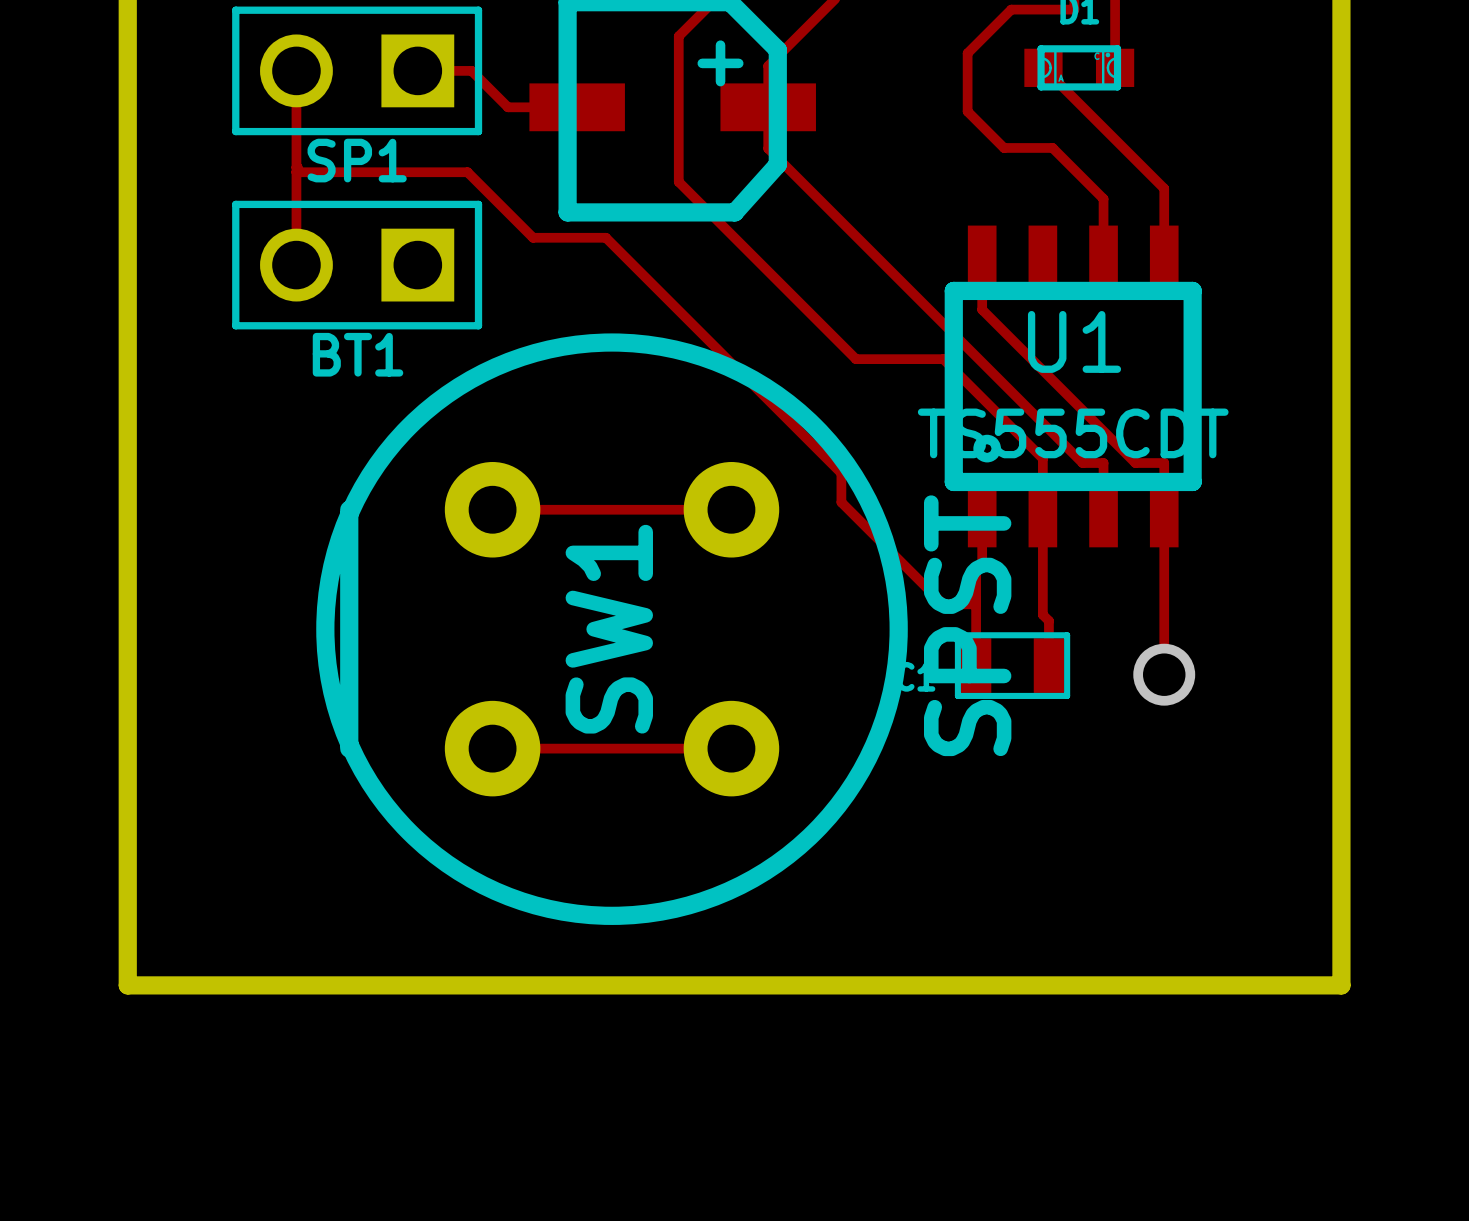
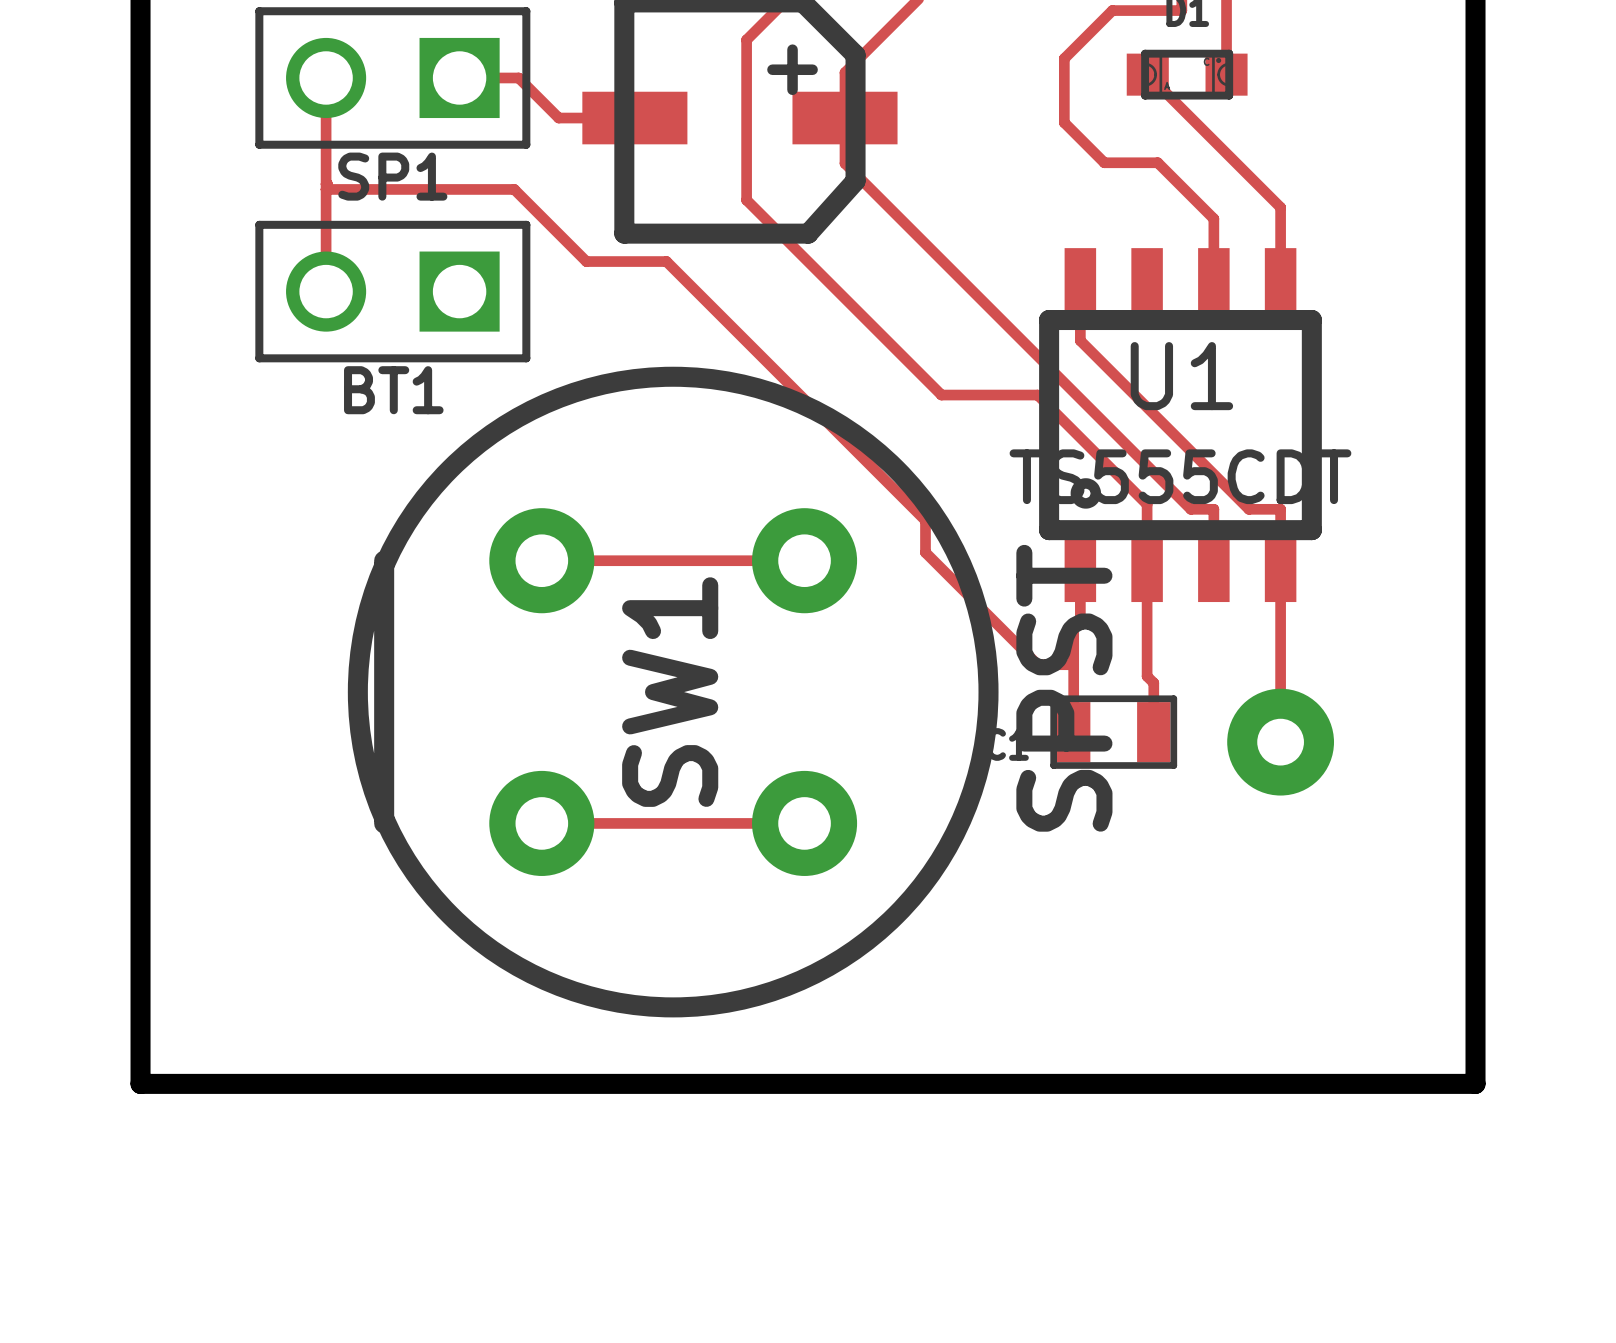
via size: [1133, 643, 1196, 706] -> [1227, 688, 1335, 796]

